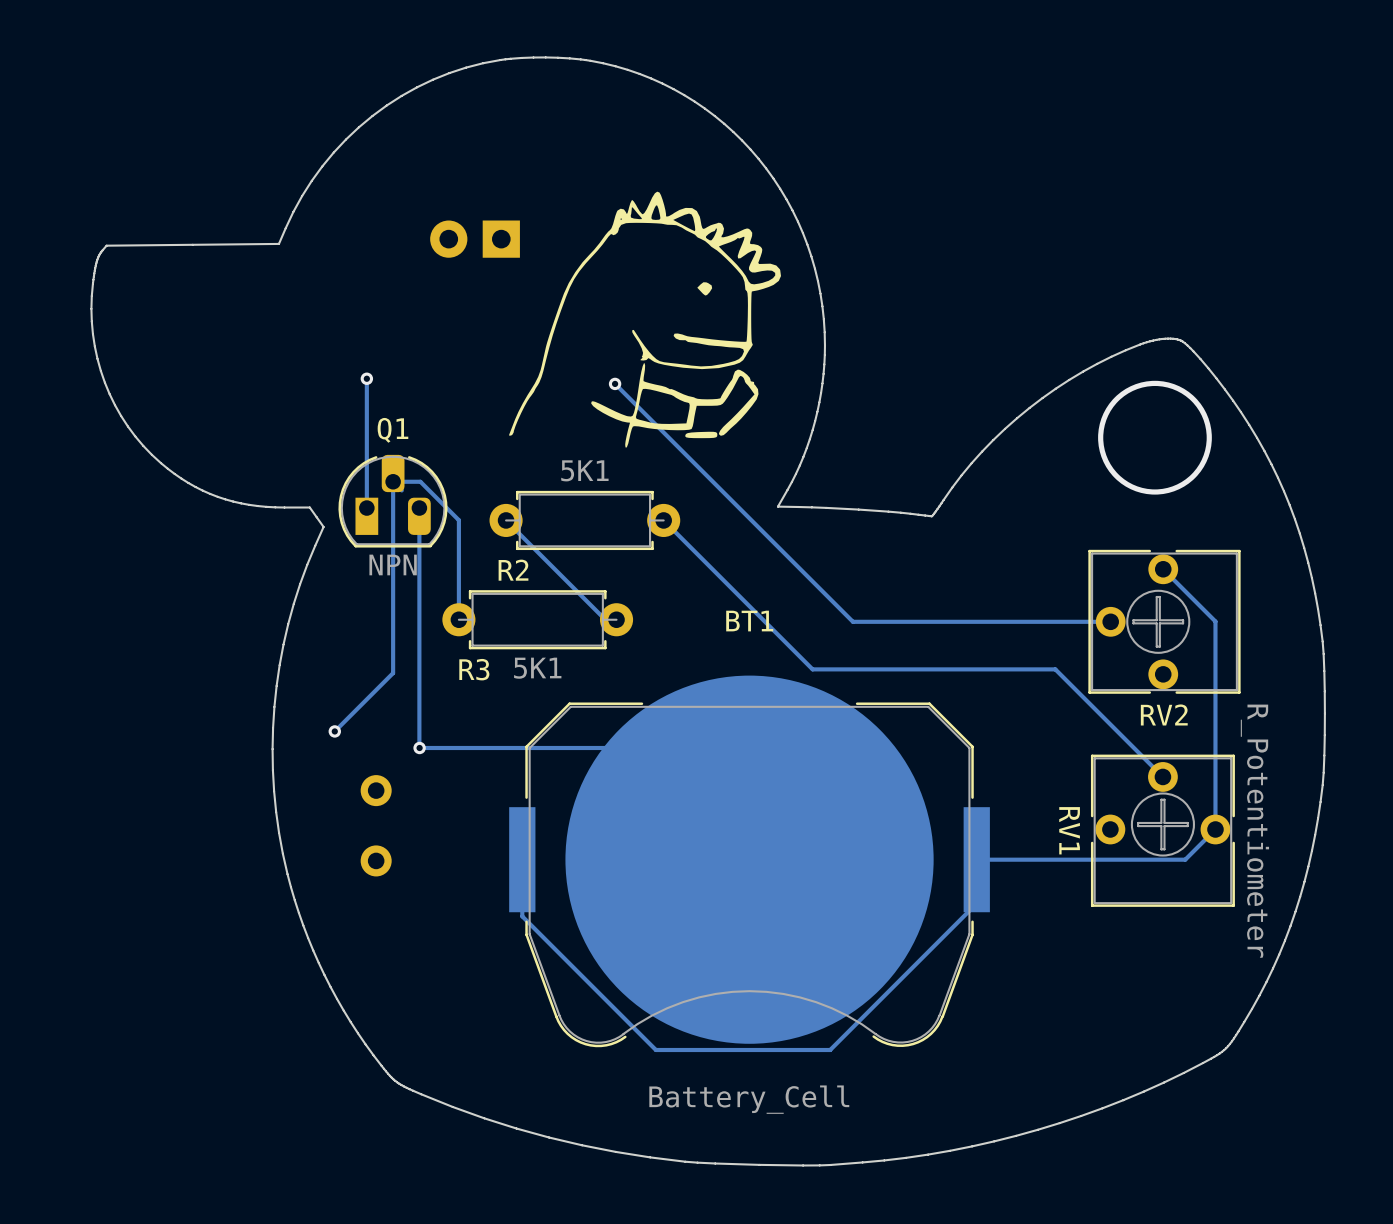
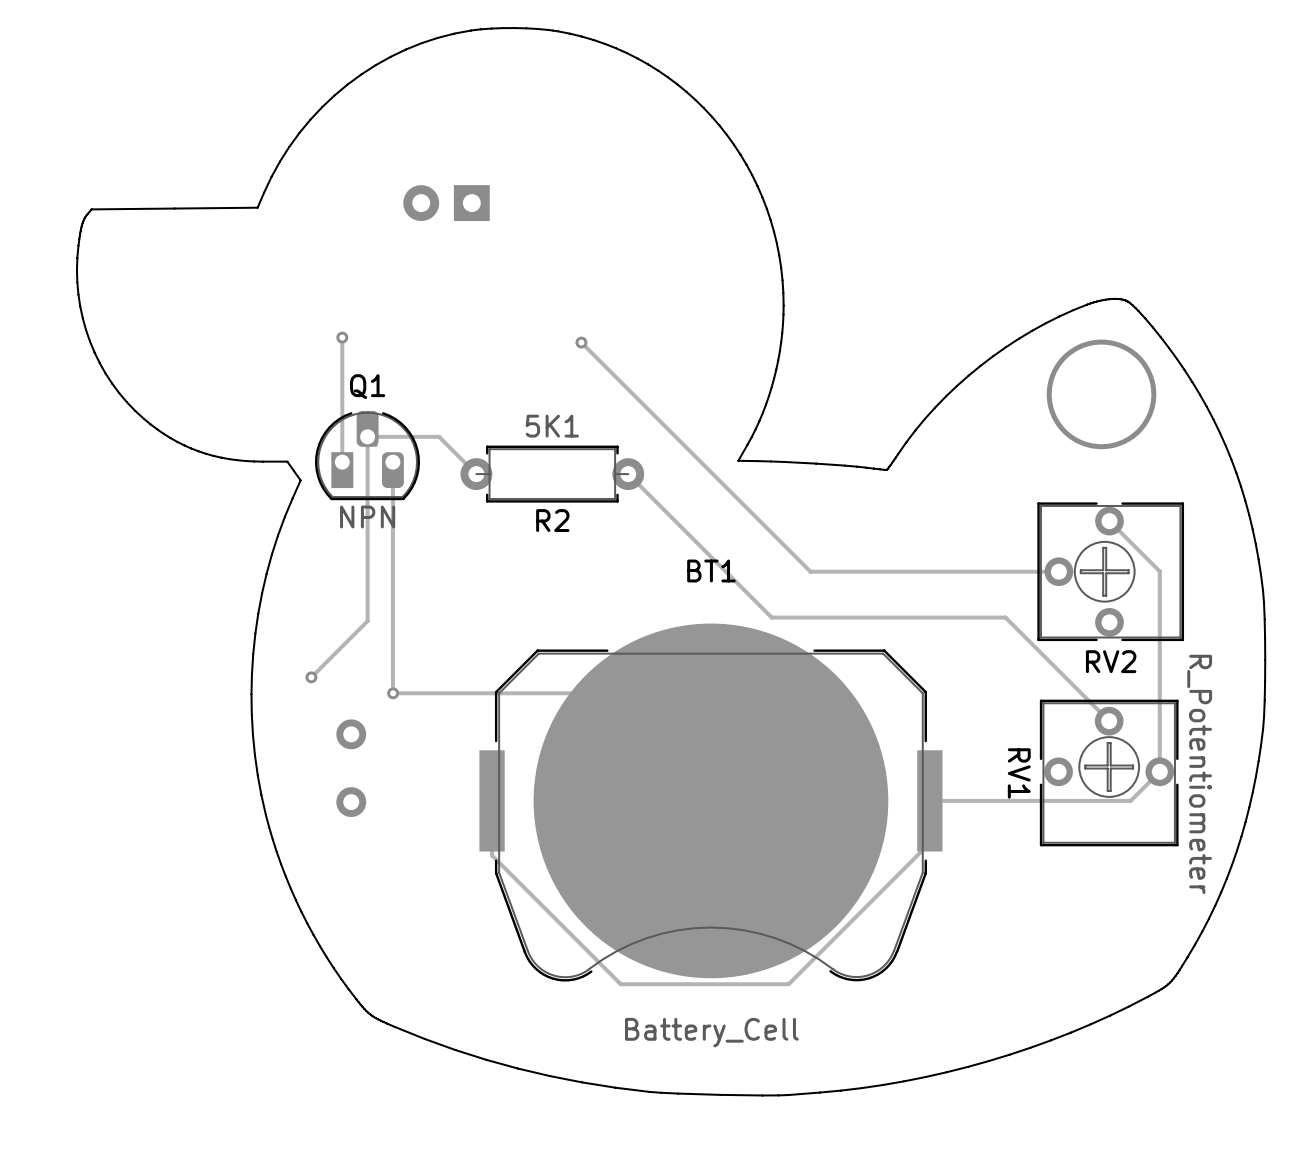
drawing: [509, 191, 781, 448] -> none
track: (420, 481) (458, 520) (458, 619) -> (393, 436) (439, 436) (476, 474)
track: (506, 520) (605, 619) (616, 619) -> none
R2 name position: R2 (513, 570) -> R2 (552, 520)
R3: 5K1 (537, 619) -> none

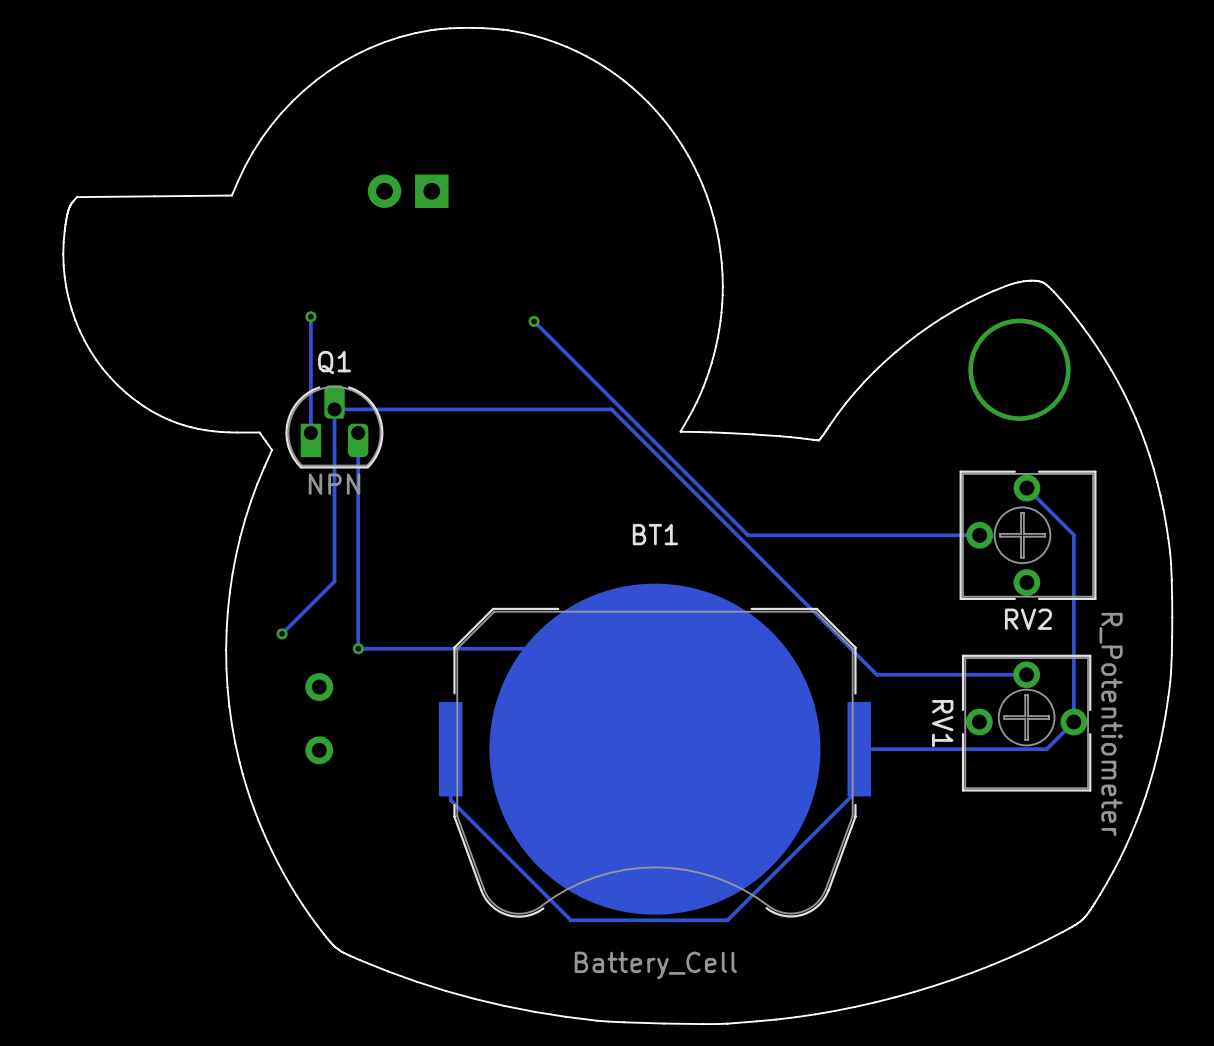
track: (439, 436) (476, 474) -> none
R2: 5K1 (552, 474) -> none
track: (628, 474) (771, 617) (1005, 617) (1109, 721) -> (401, 409) (611, 409) (876, 674) (1026, 674)

